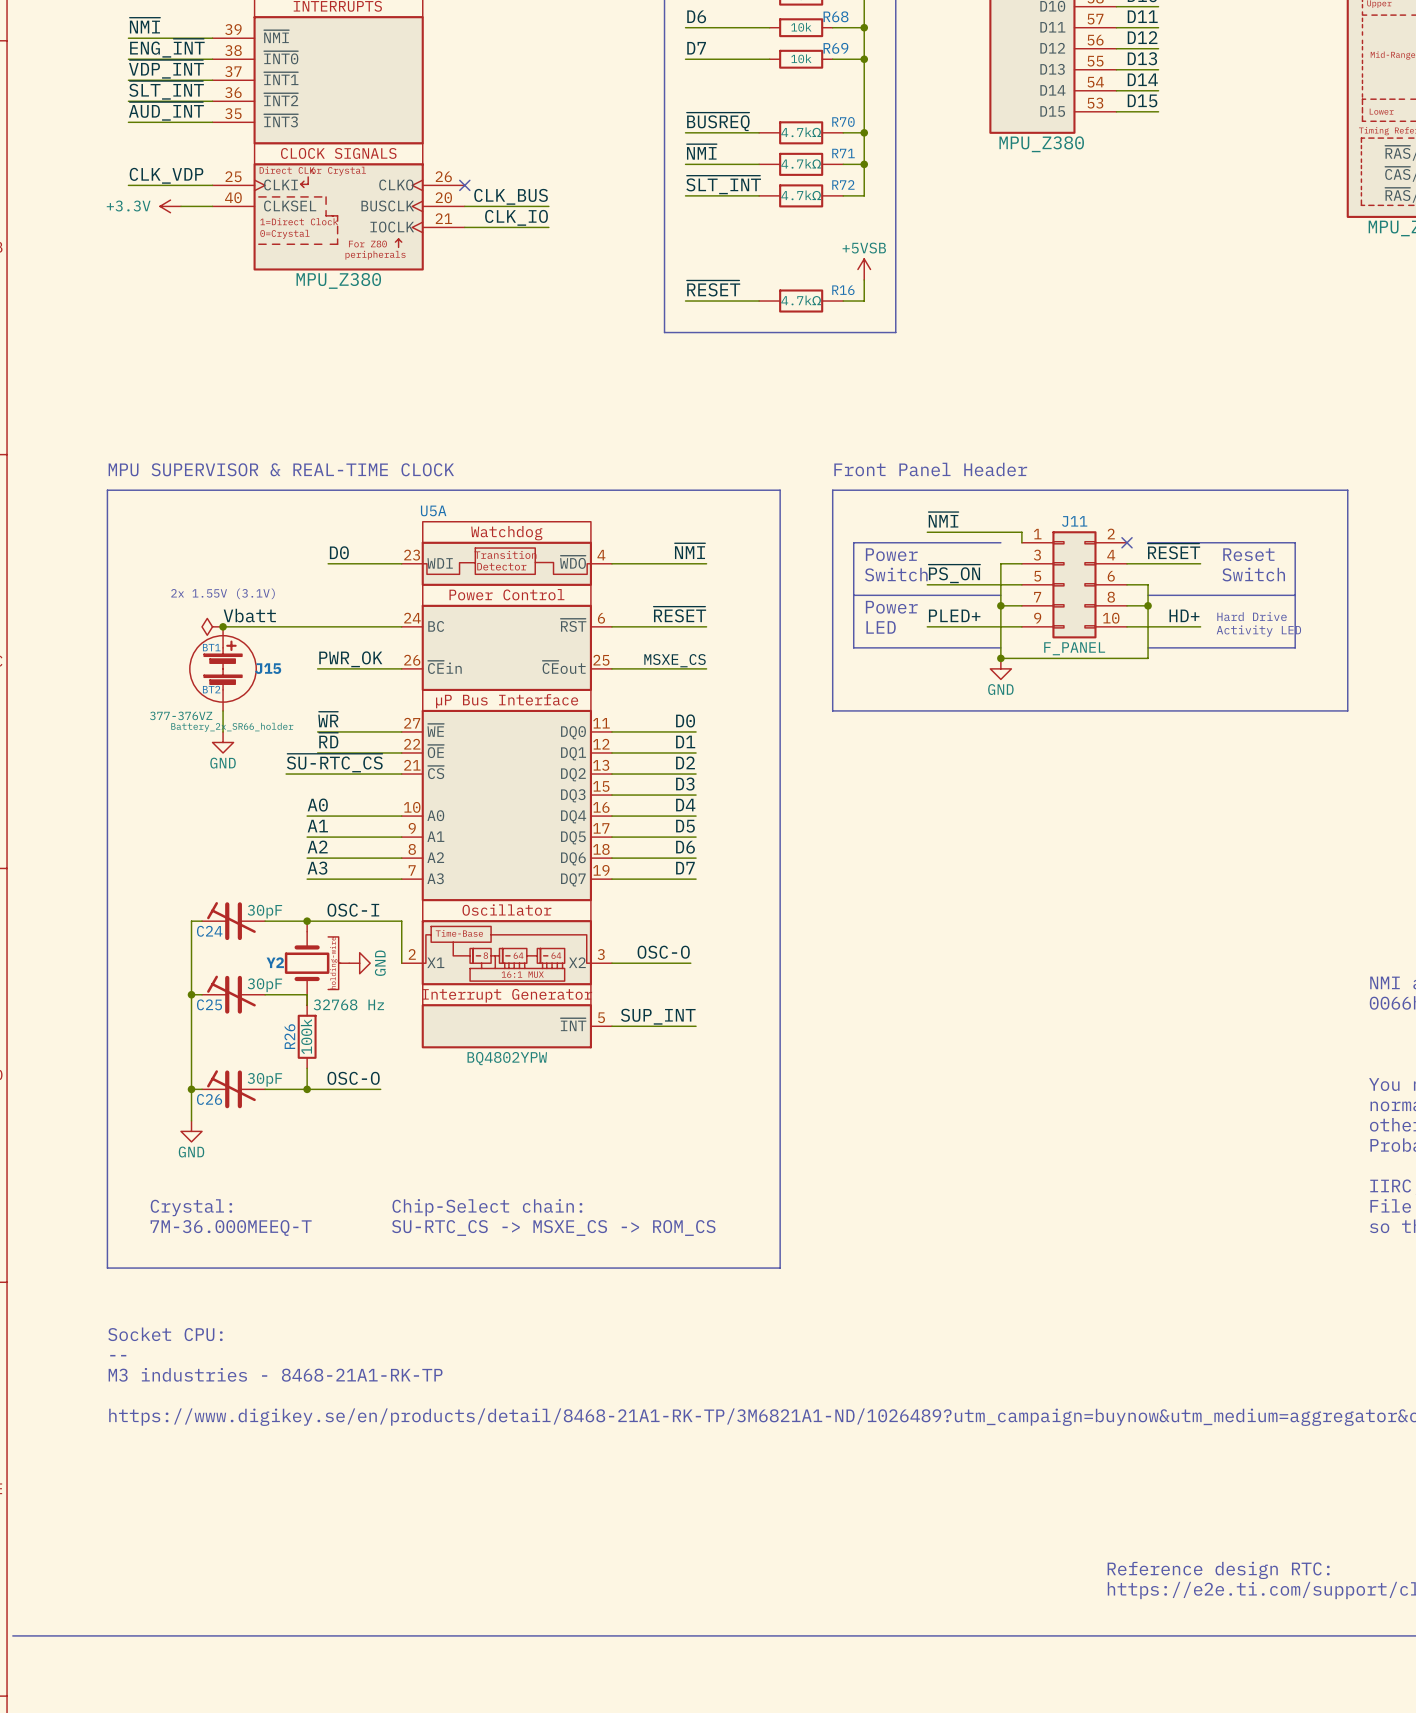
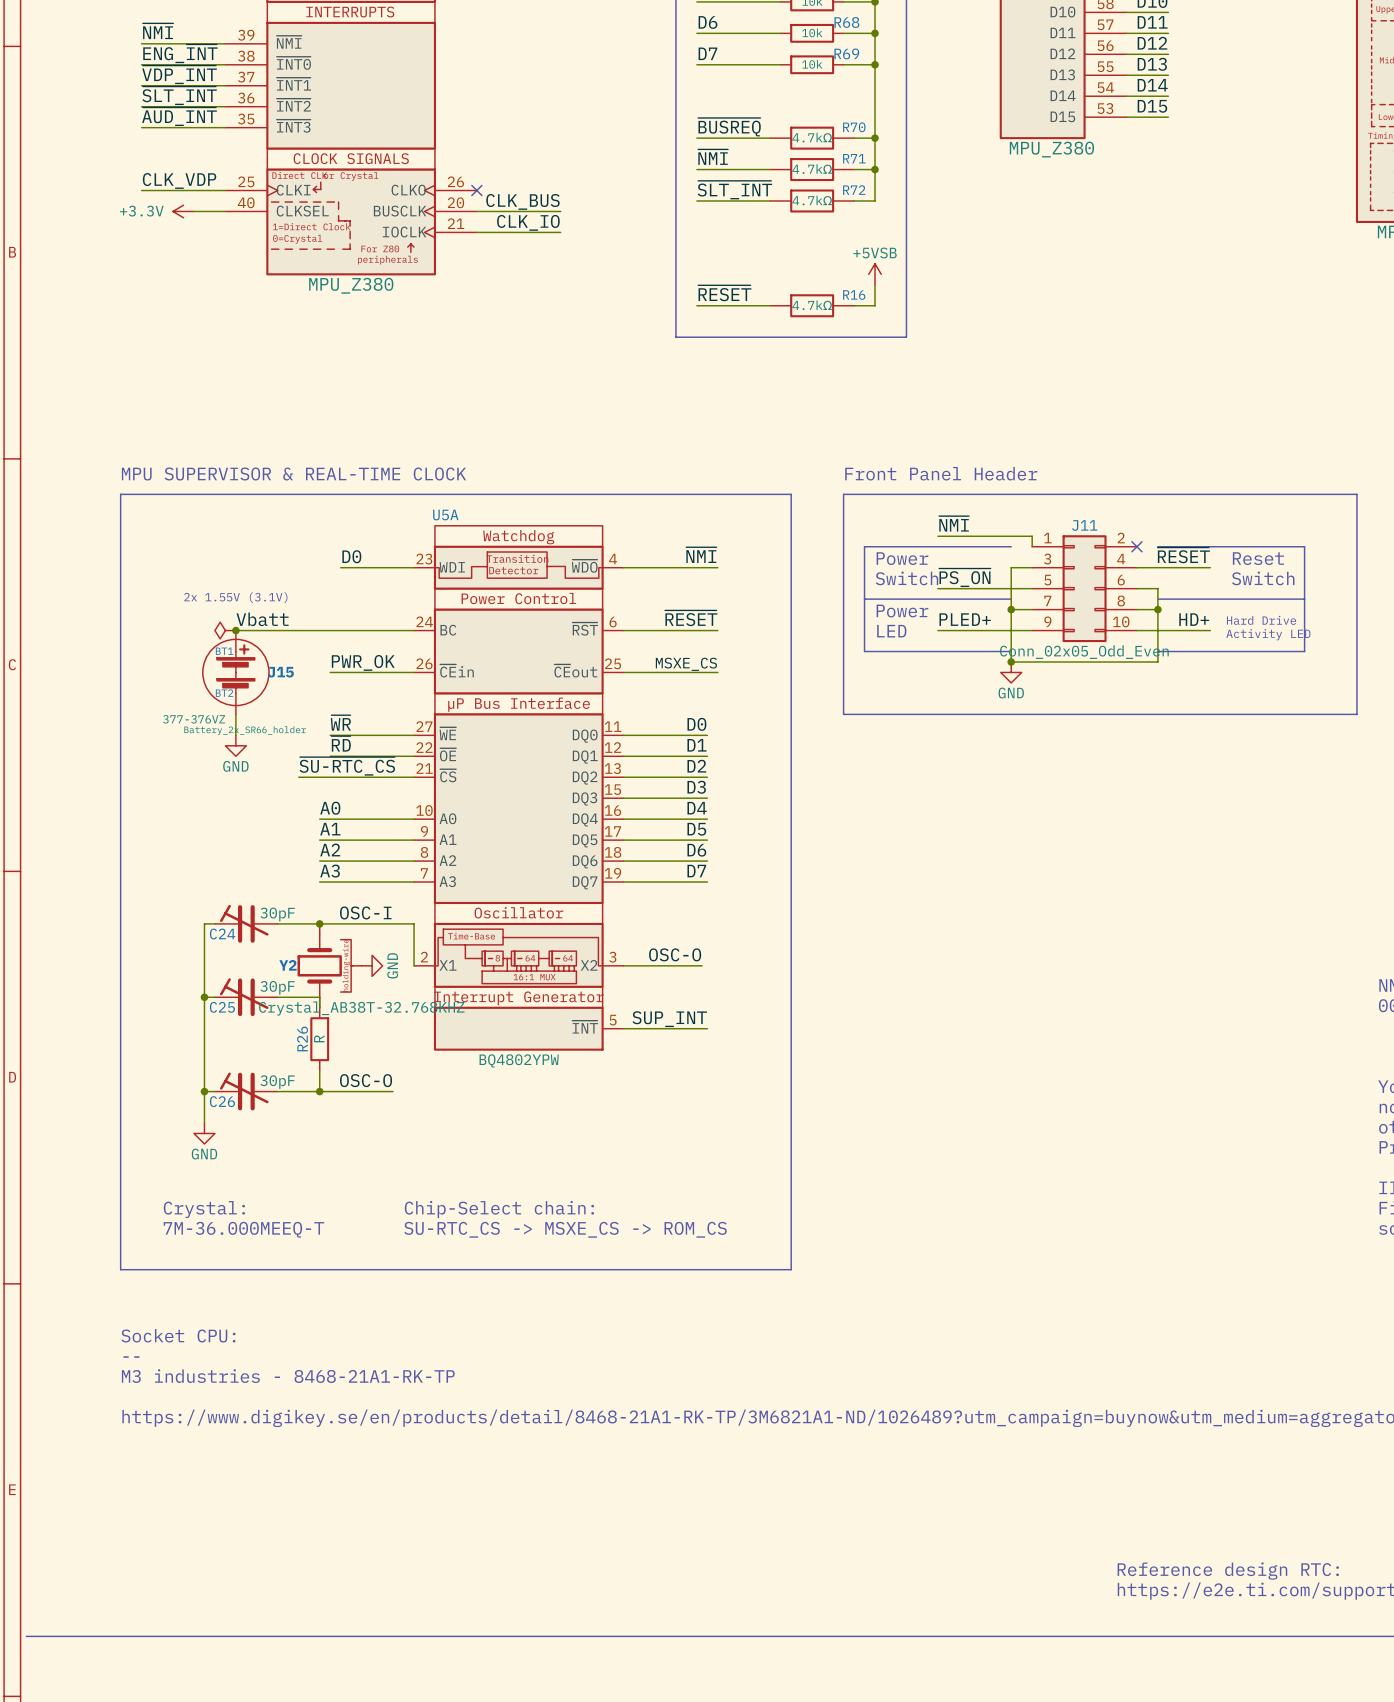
J11 value: F_PANEL (1074, 648) -> Conn_02x05_Odd_Even (1084, 652)
Y2 value: 32768 Hz (348, 1004) -> Crystal_AB38T-32.768KHZ (361, 1008)
R26 value: 100k (306, 1036) -> R (319, 1038)

